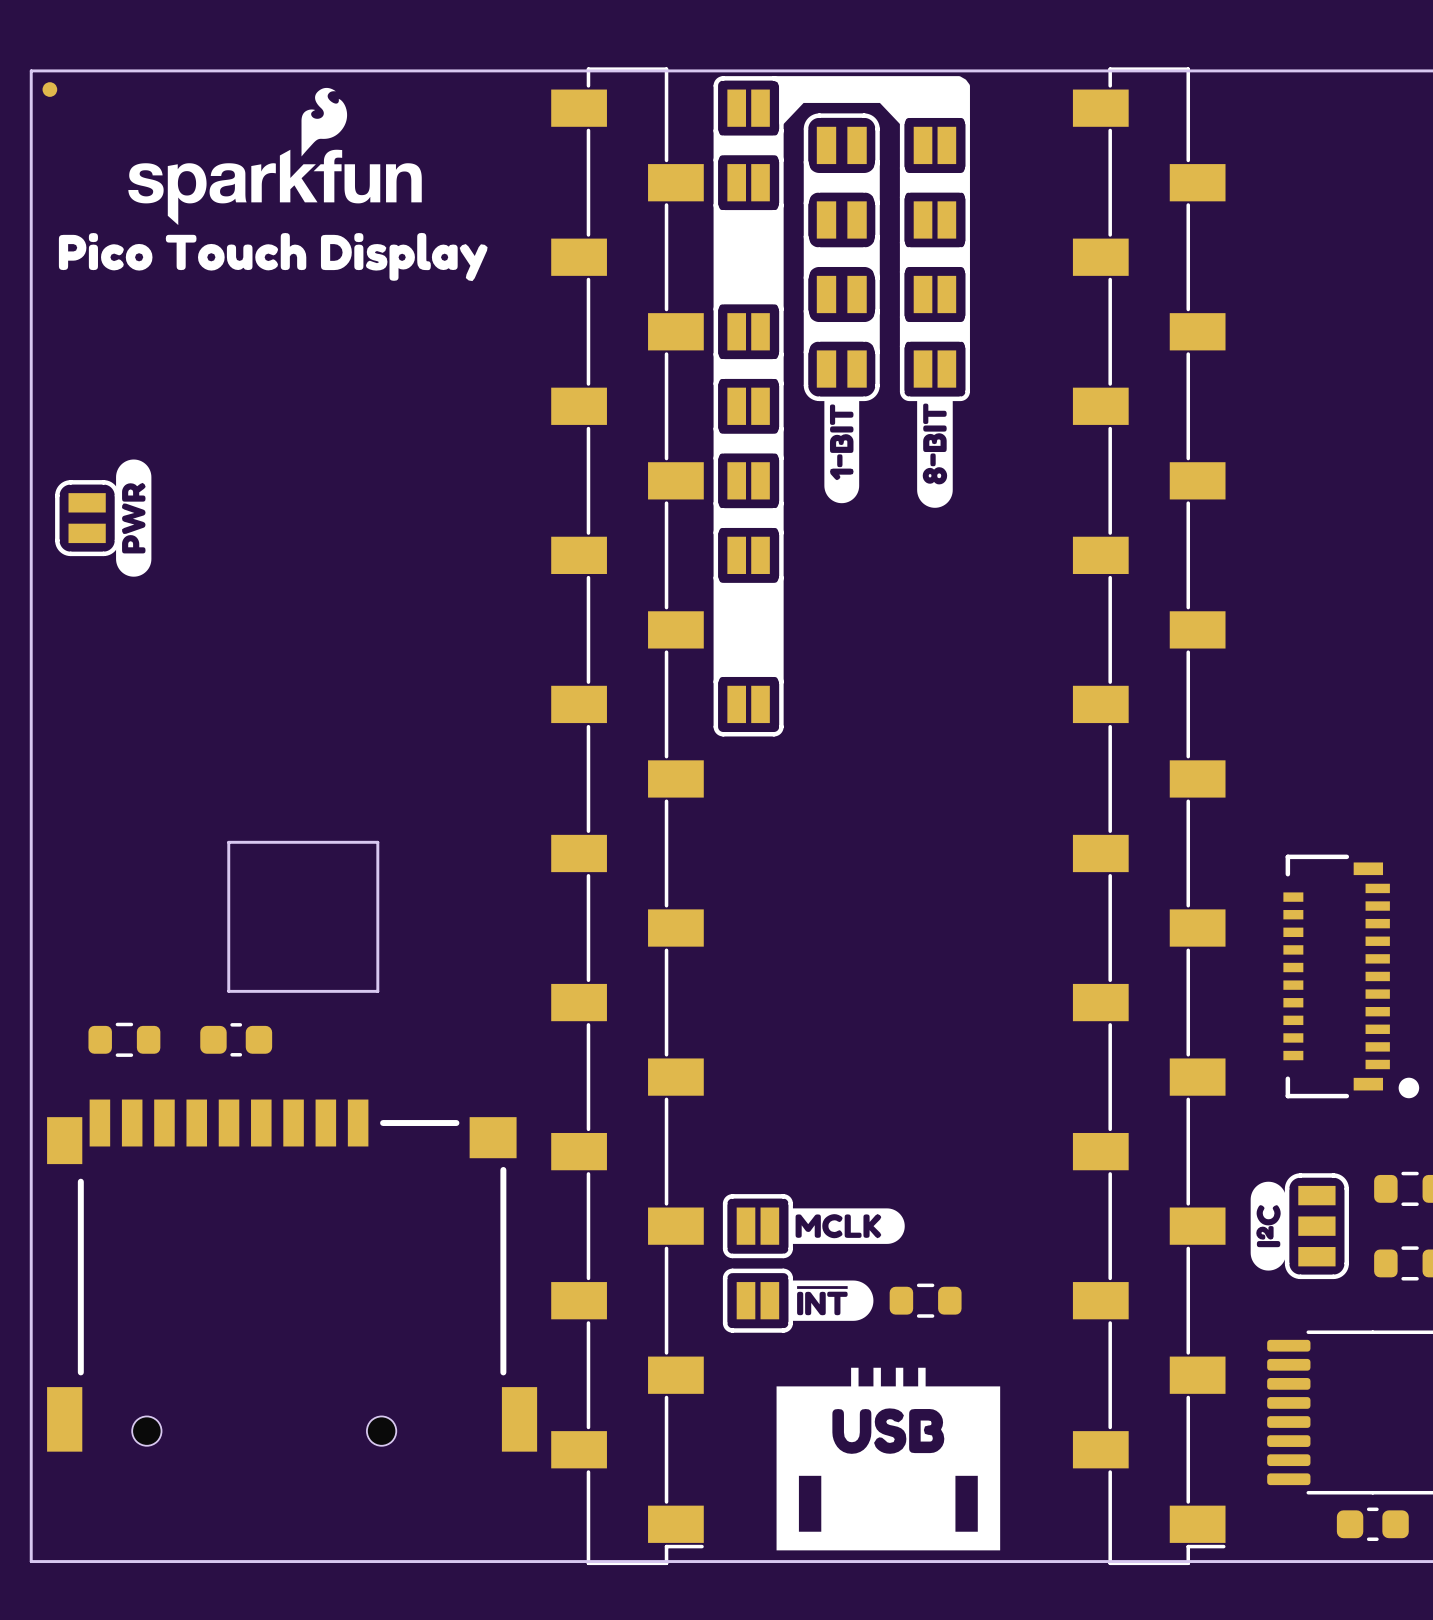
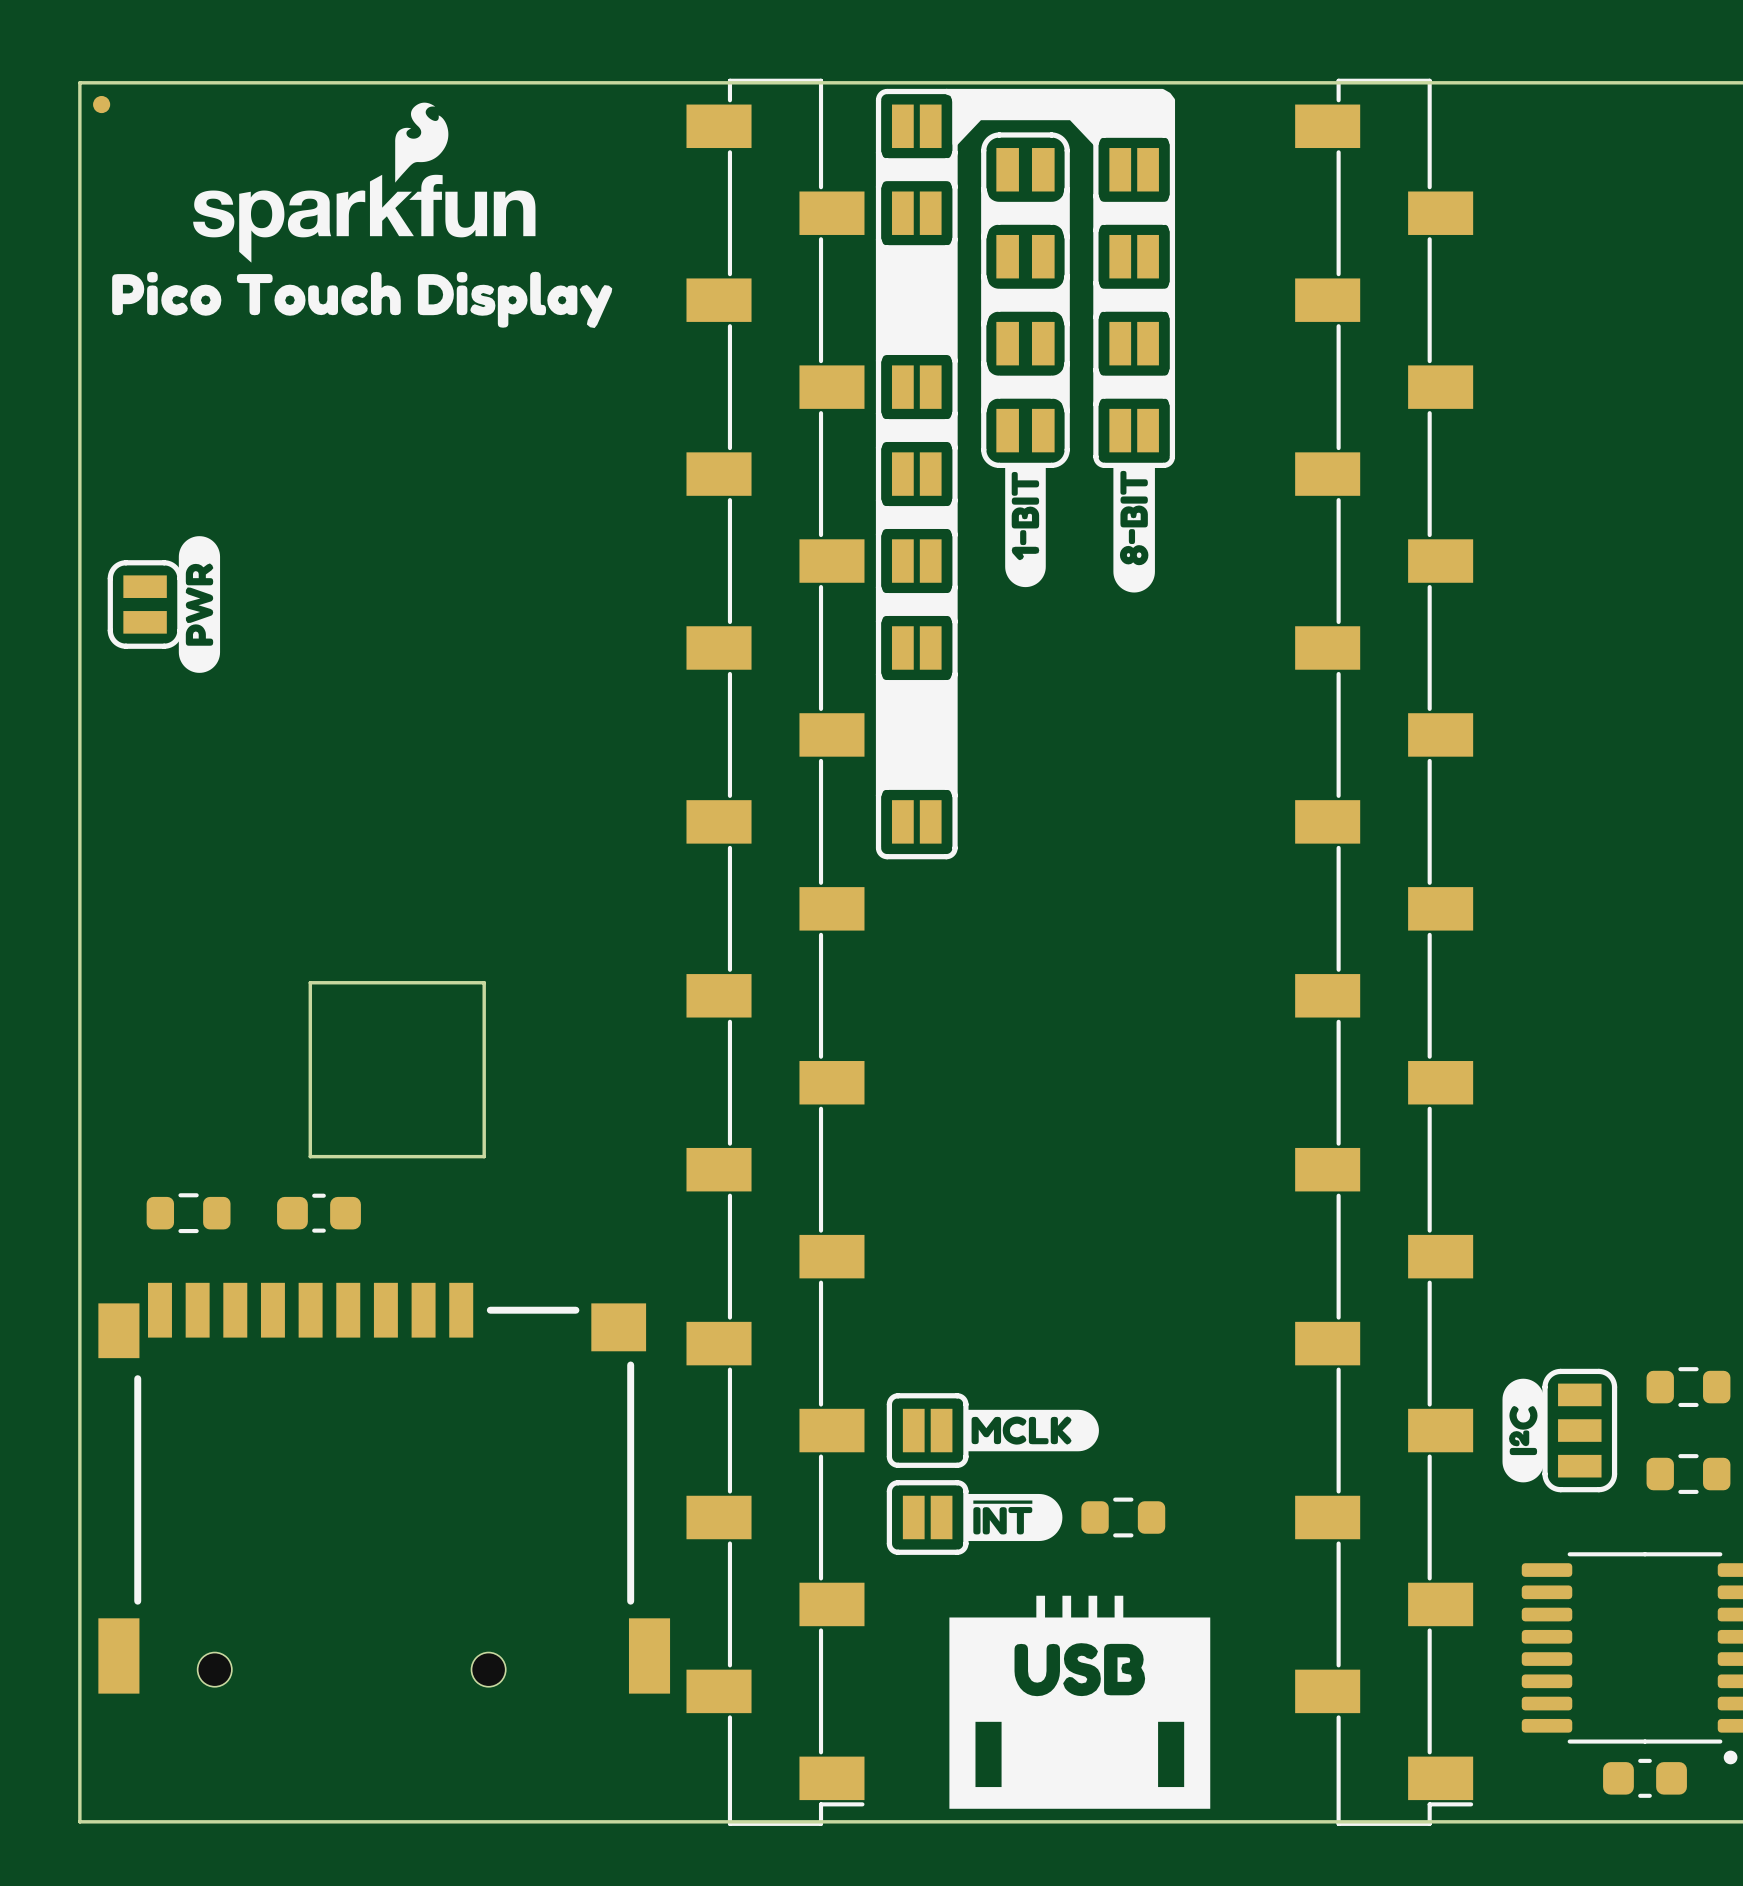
part: (1351, 976) -> none

